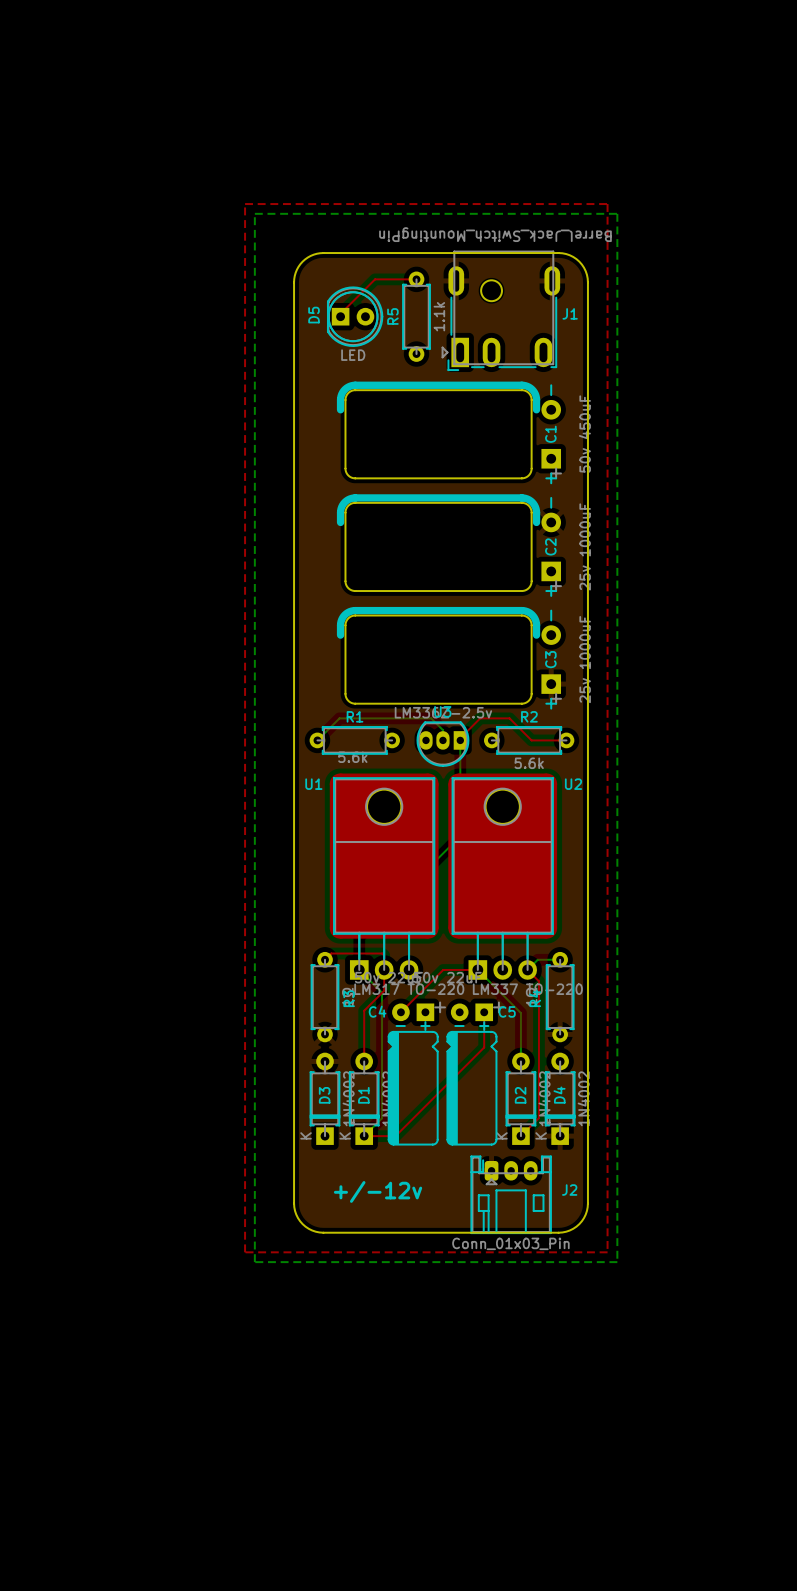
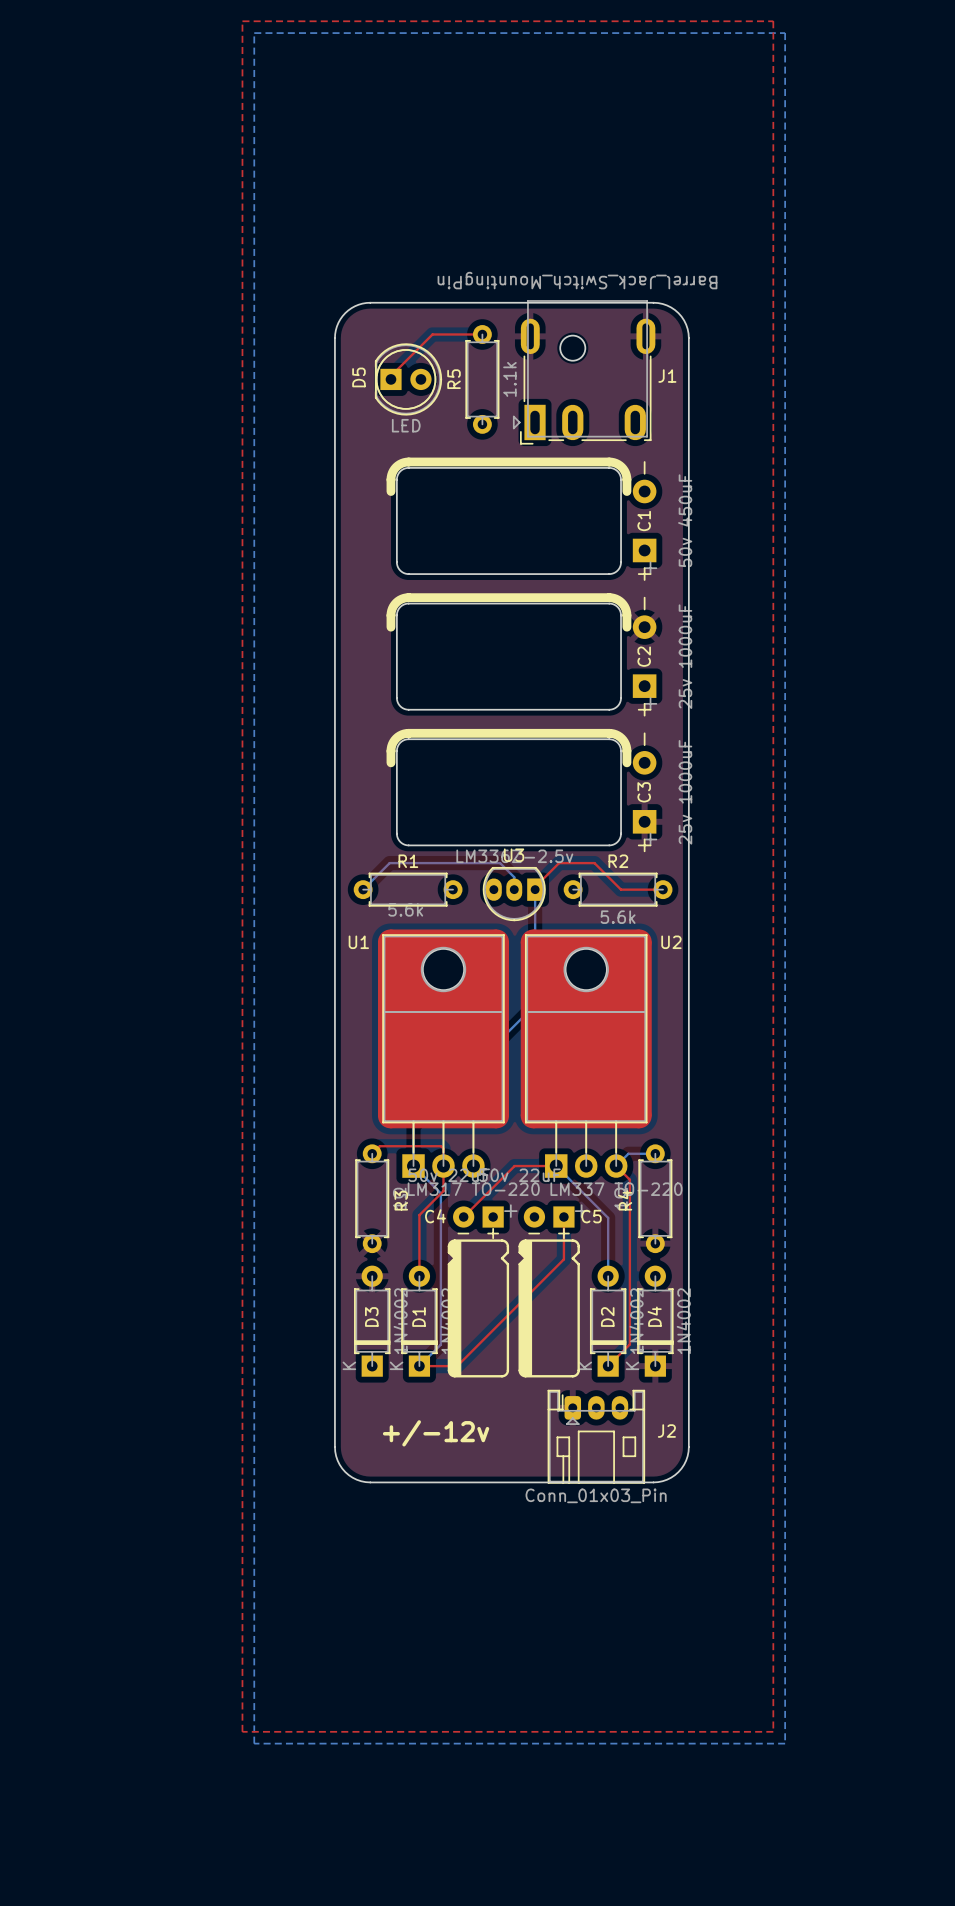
top zone outline: (245, 204) (607, 204) (607, 1252) (245, 1252) (245, 204) -> (242, 21) (242, 1731) (773, 1731) (773, 21) (242, 21)
bottom zone outline: (254, 213) (617, 213) (617, 1262) (254, 1262) (254, 213) -> (254, 33) (254, 1743) (785, 1743) (785, 33) (254, 33)

